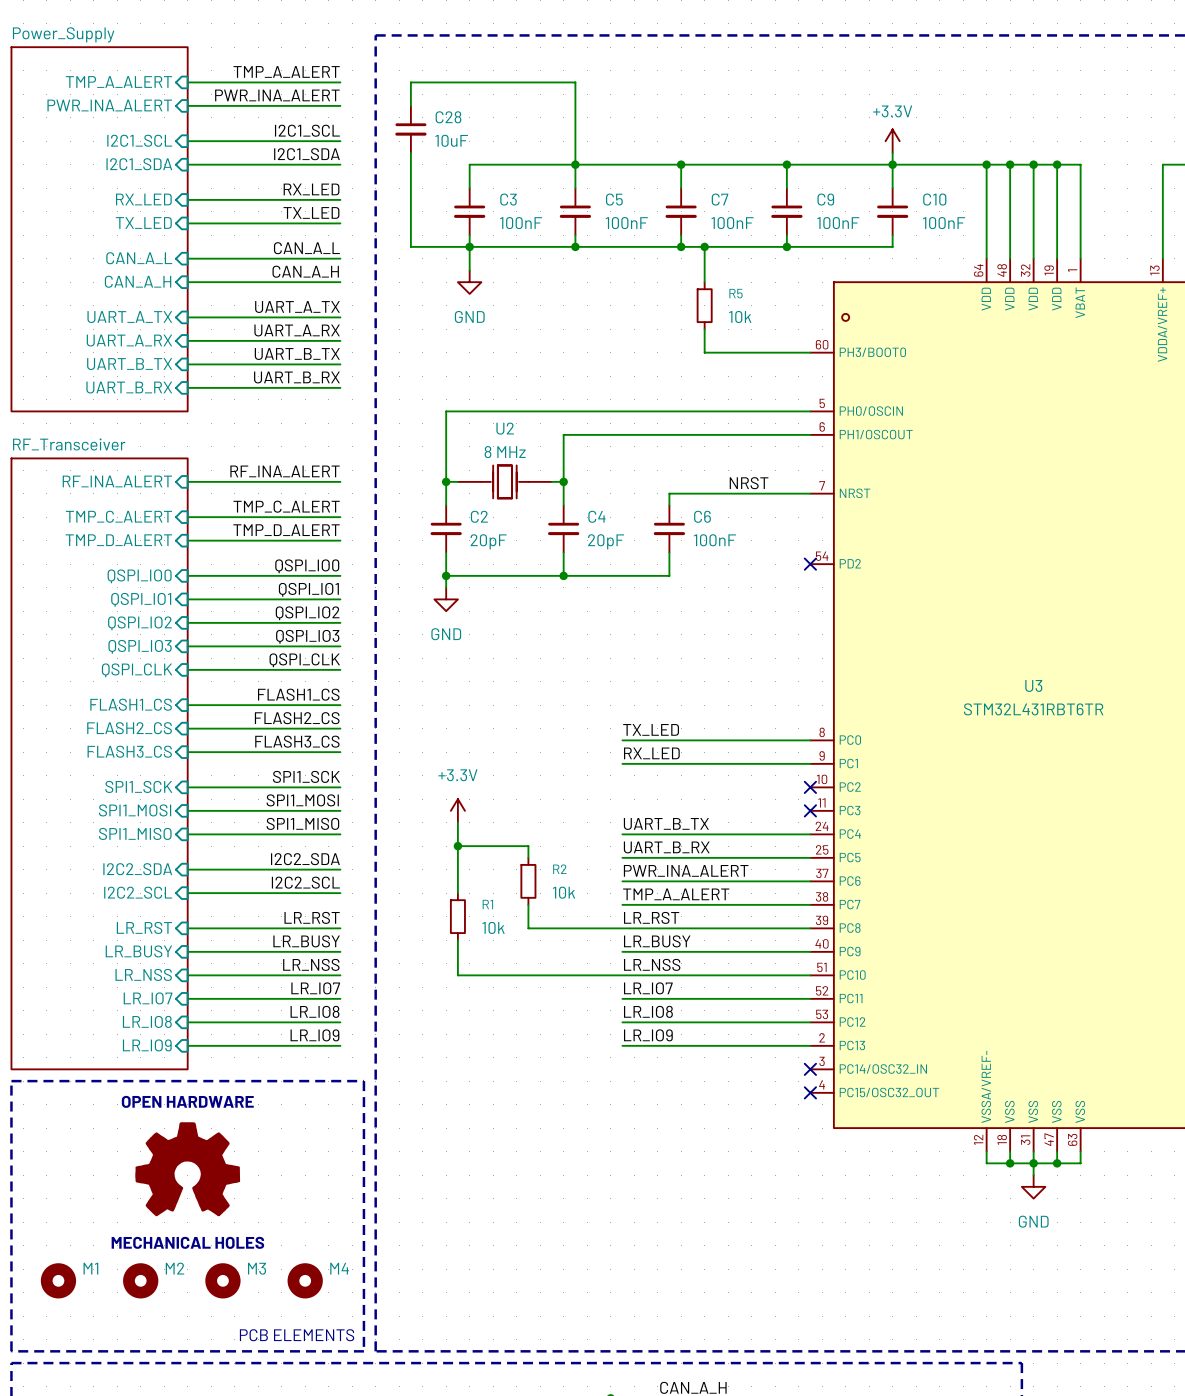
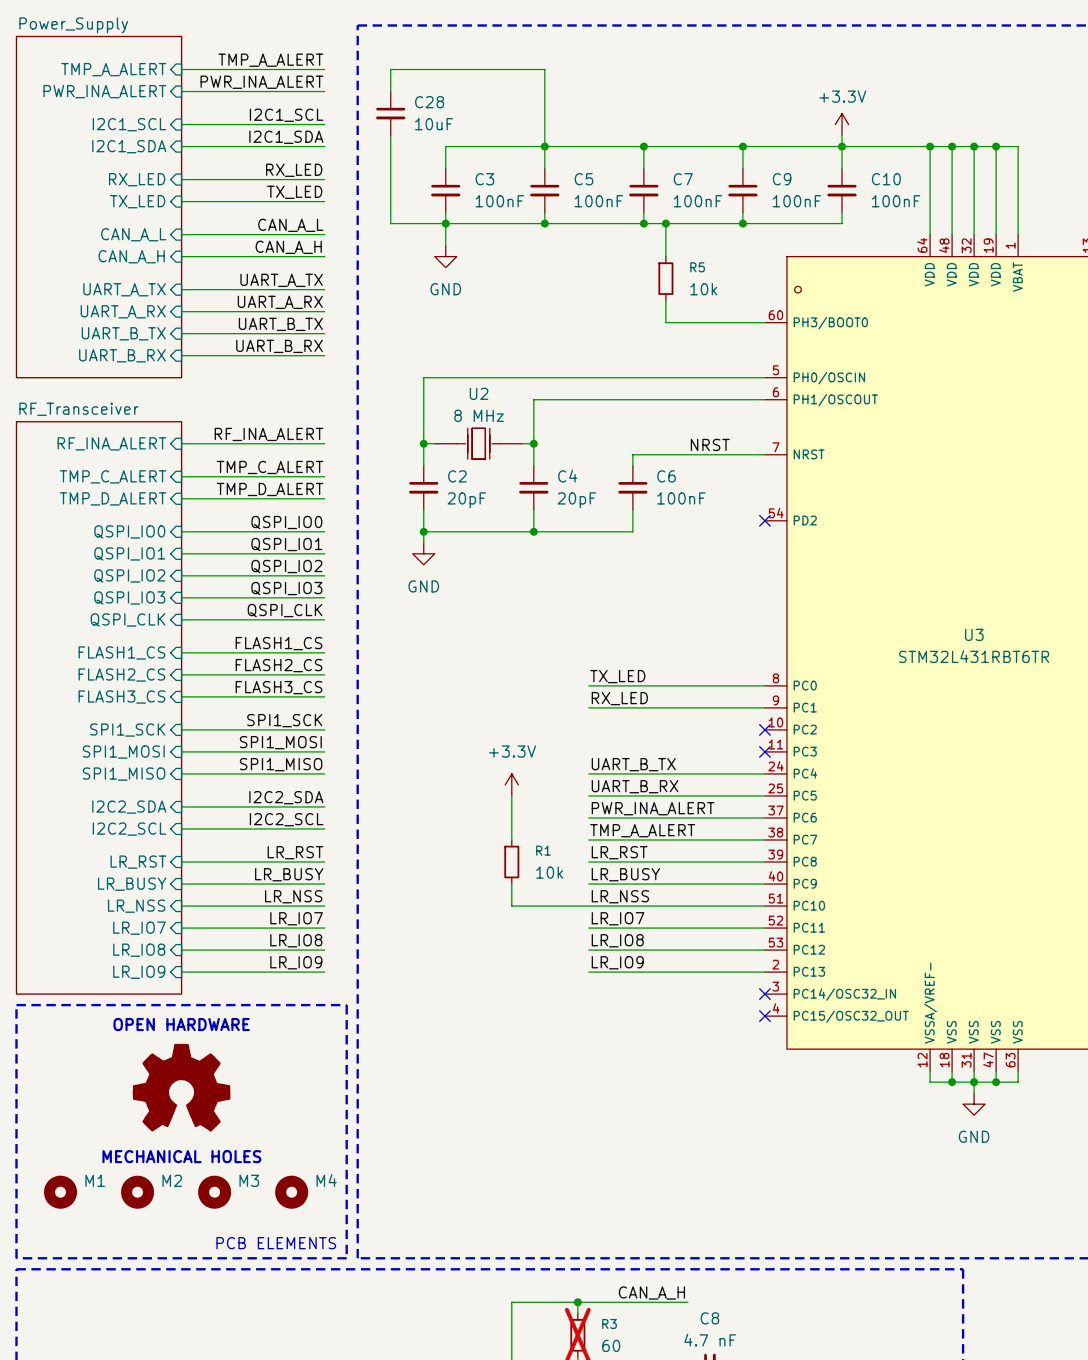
power symbol position: +3.3V (457, 810) -> +3.3V (511, 784)
wire: (457, 822) (457, 893) -> none
wire: (457, 846) (528, 846) (528, 857) -> none
junction: (457, 846) -> none
wire: none -> (511, 795) (511, 840)
R2: 10k (528, 881) -> none
wire: (528, 904) (528, 928) (622, 928) -> none
R1 position: (457, 916) -> (511, 862)
wire: (457, 940) (457, 975) (540, 975) -> (511, 884) (511, 906)

